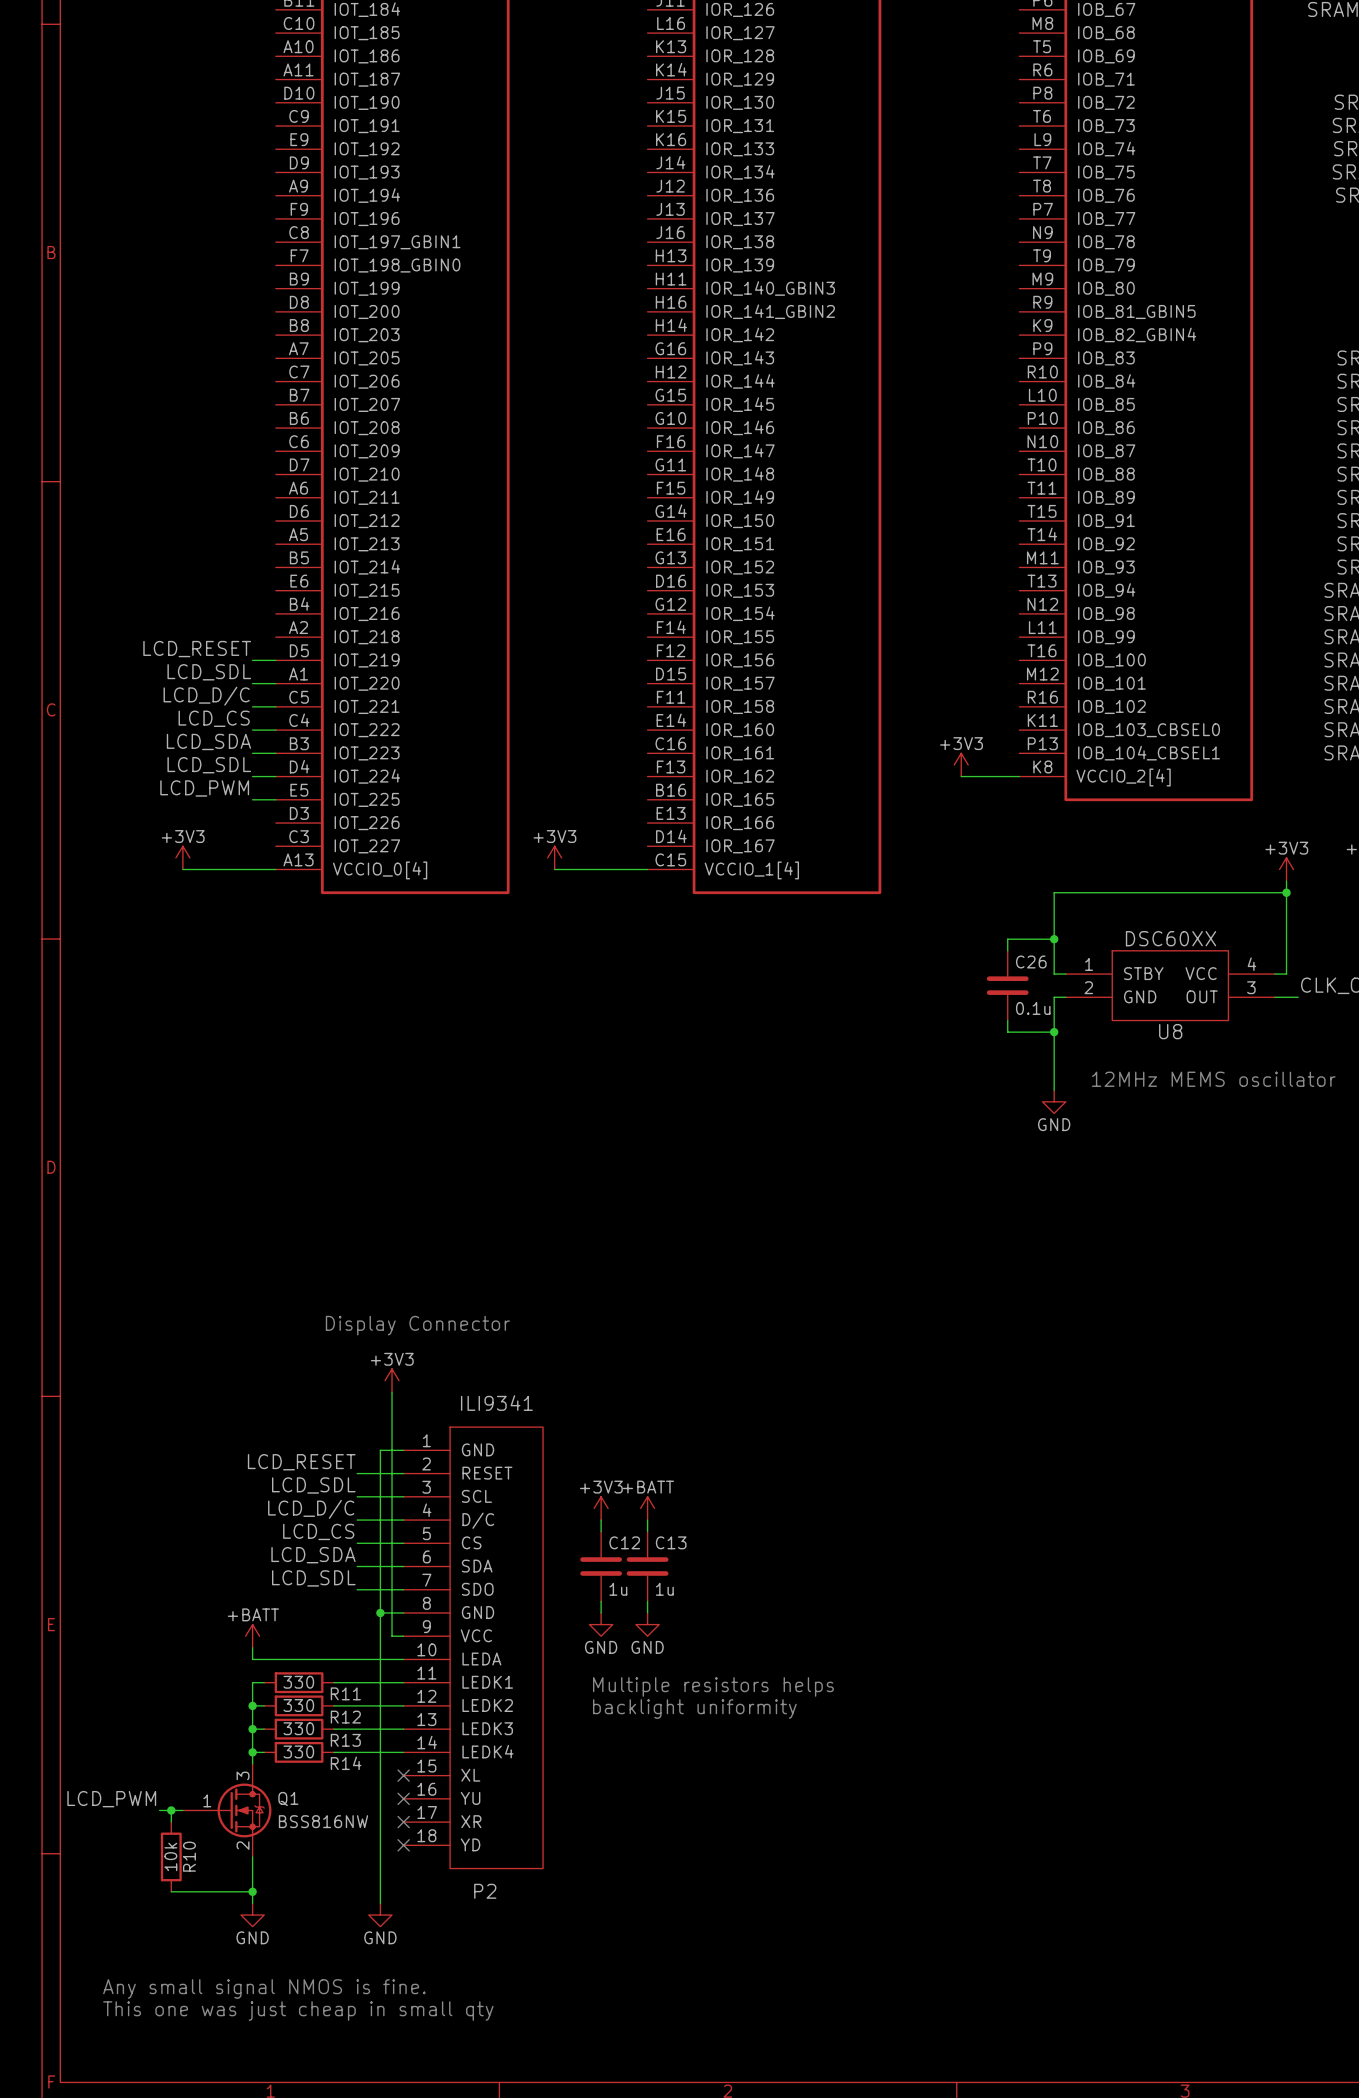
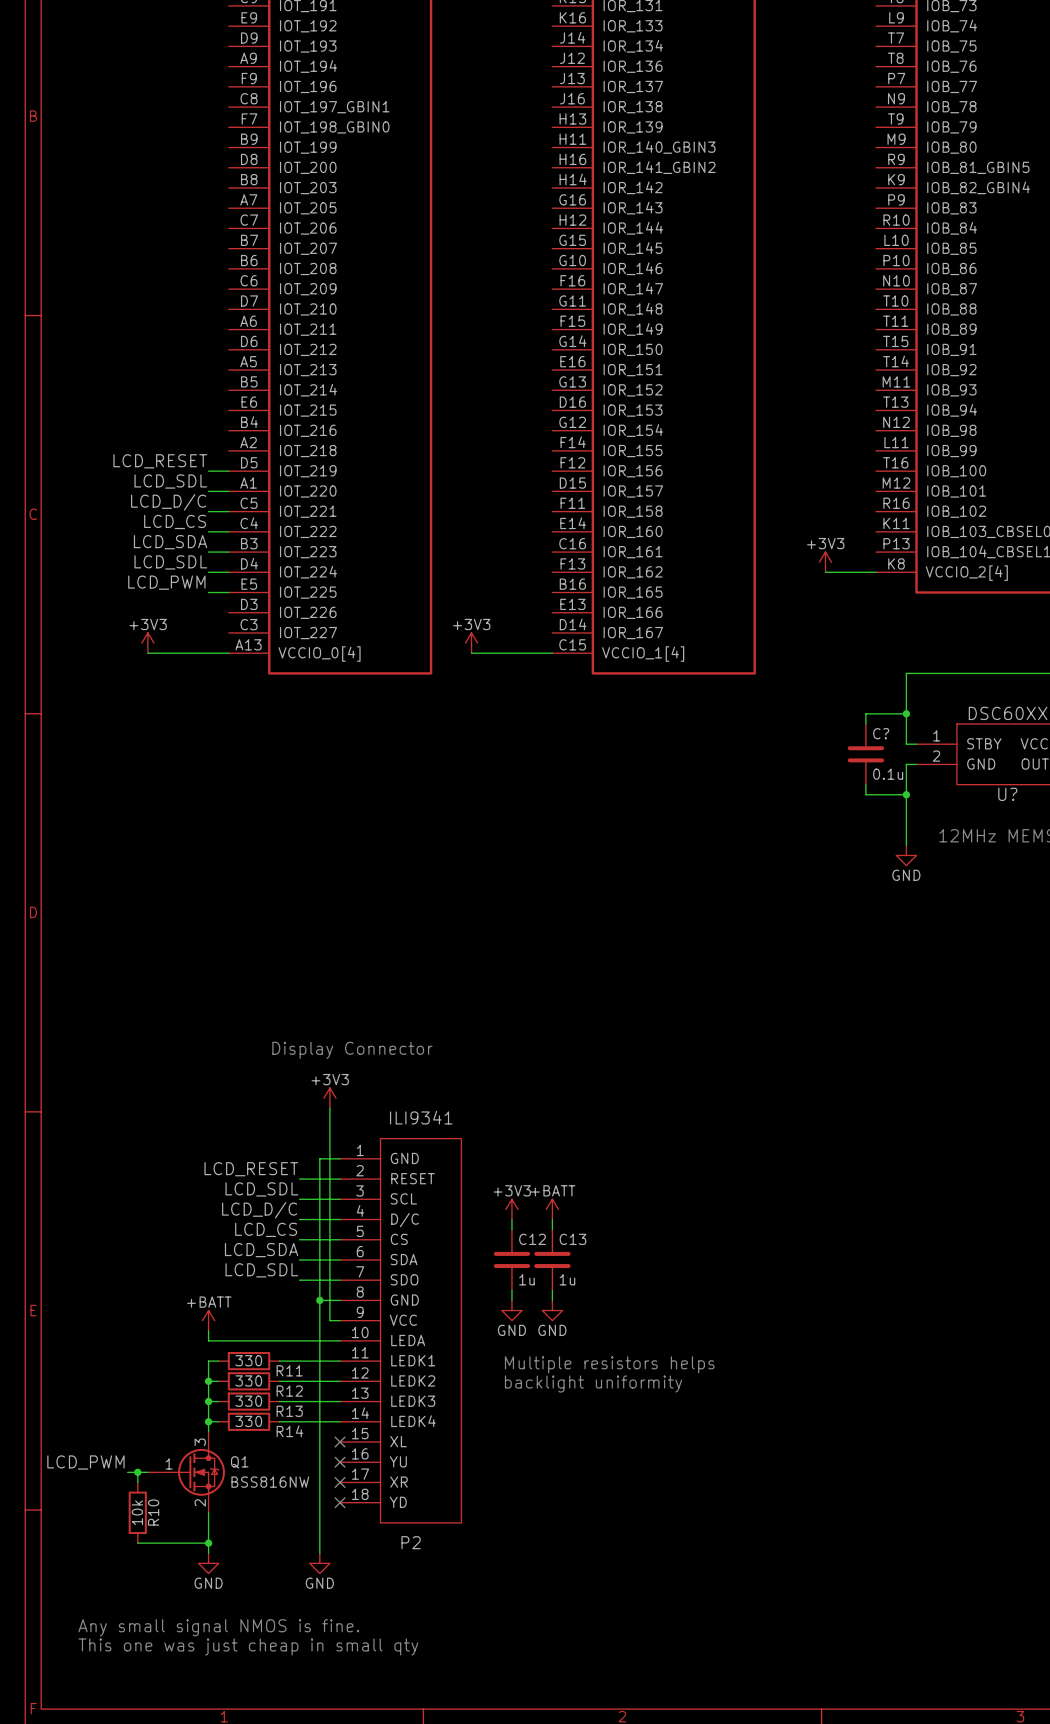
C26 name: C26 (1031, 962) -> C? (881, 733)
U8 name: U8 (1170, 1031) -> U? (1007, 794)

